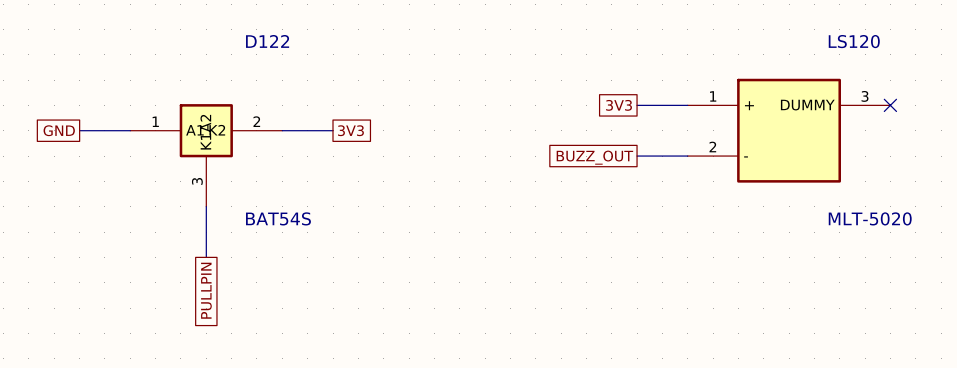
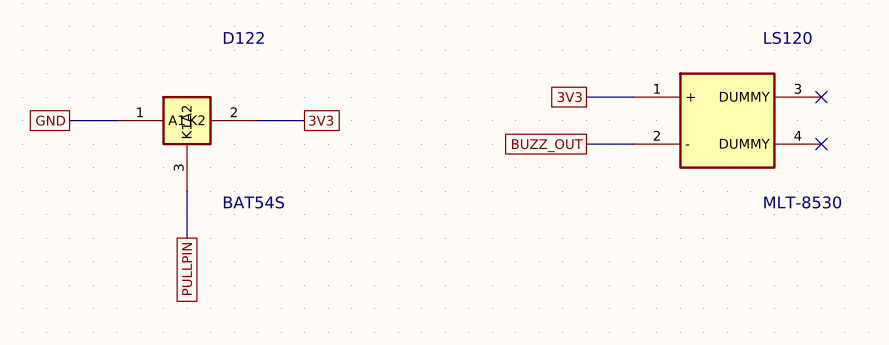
LS120 symbol: [687, 78, 891, 183] -> [633, 72, 822, 169]
no-connect mark: none -> (821, 144)
LS120 value: MLT-5020 (870, 218) -> MLT-8530 (802, 202)

